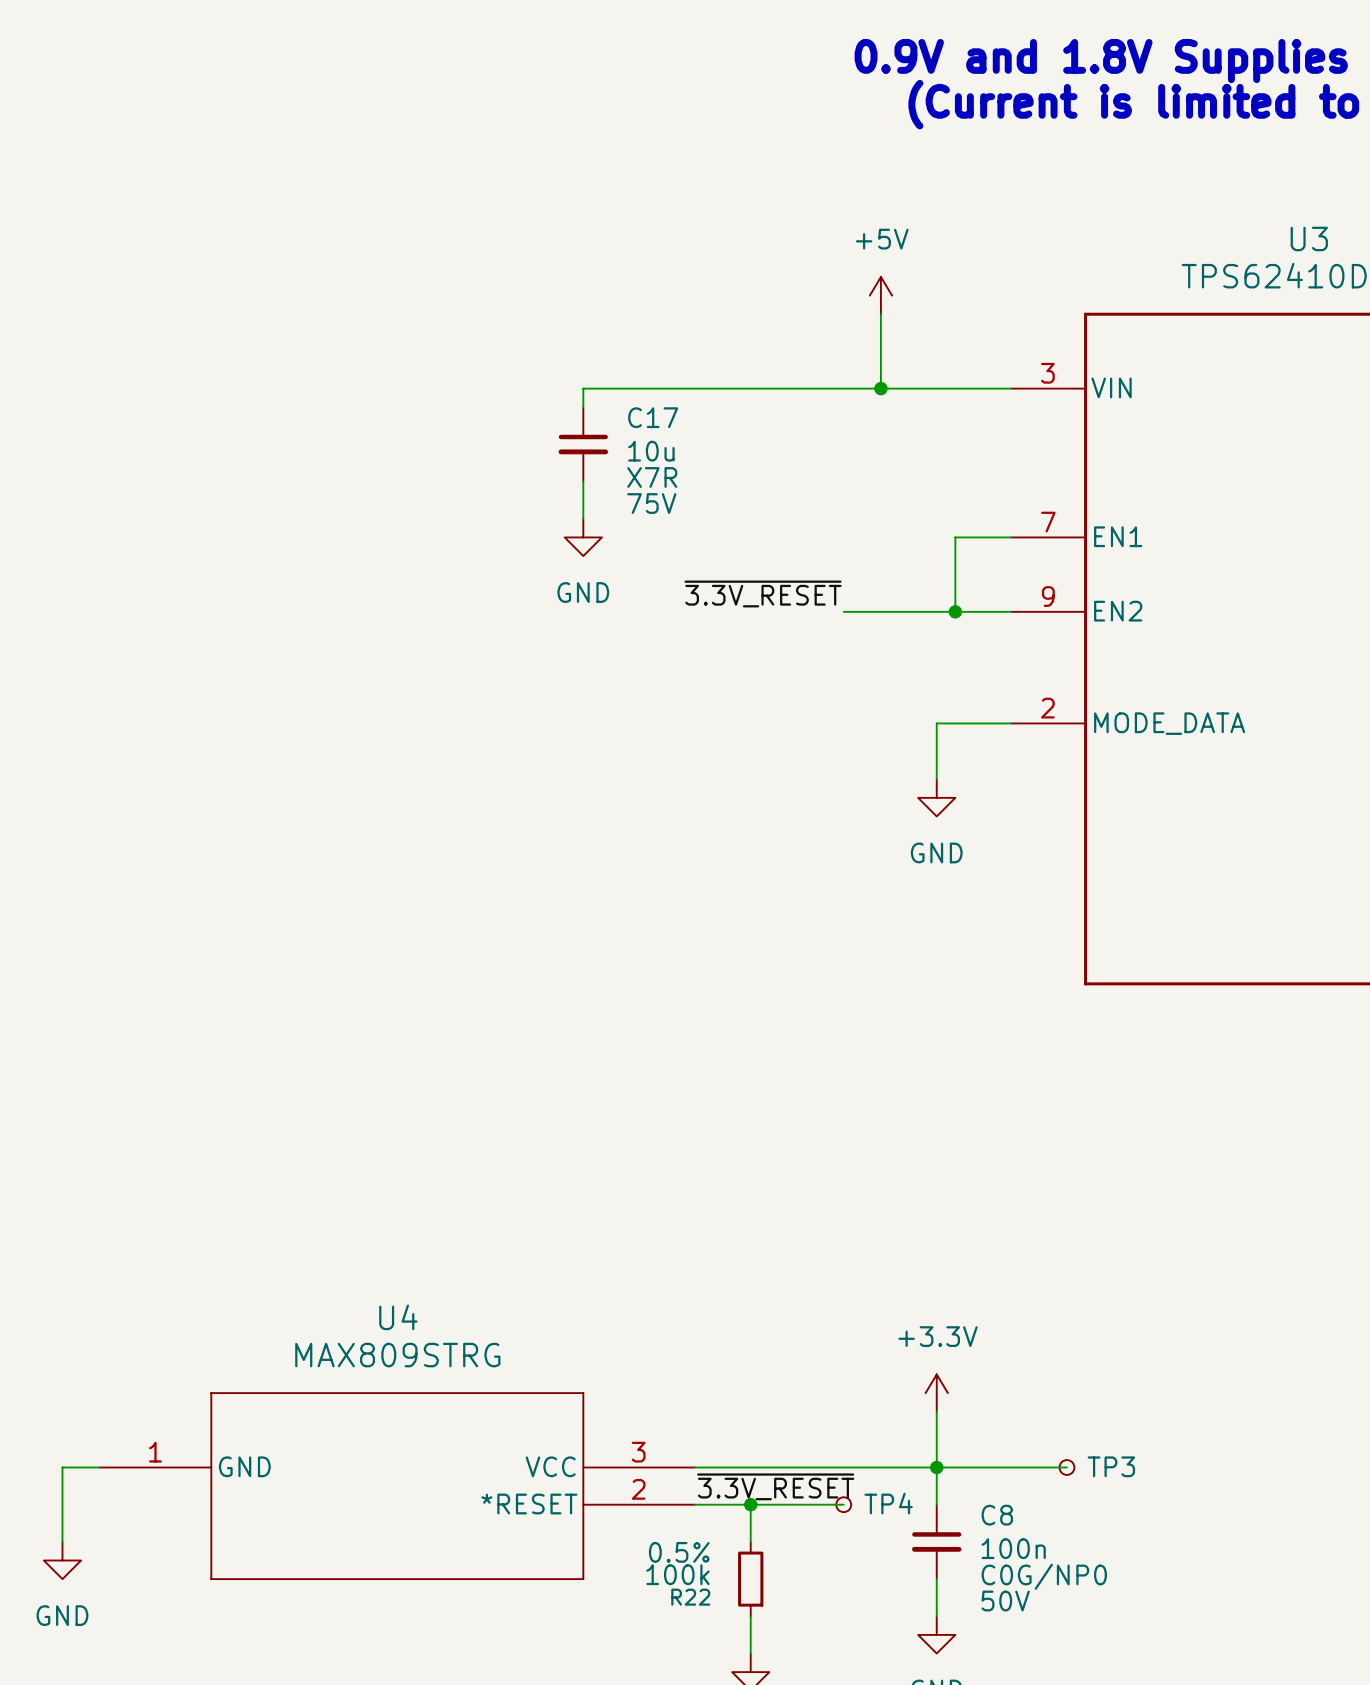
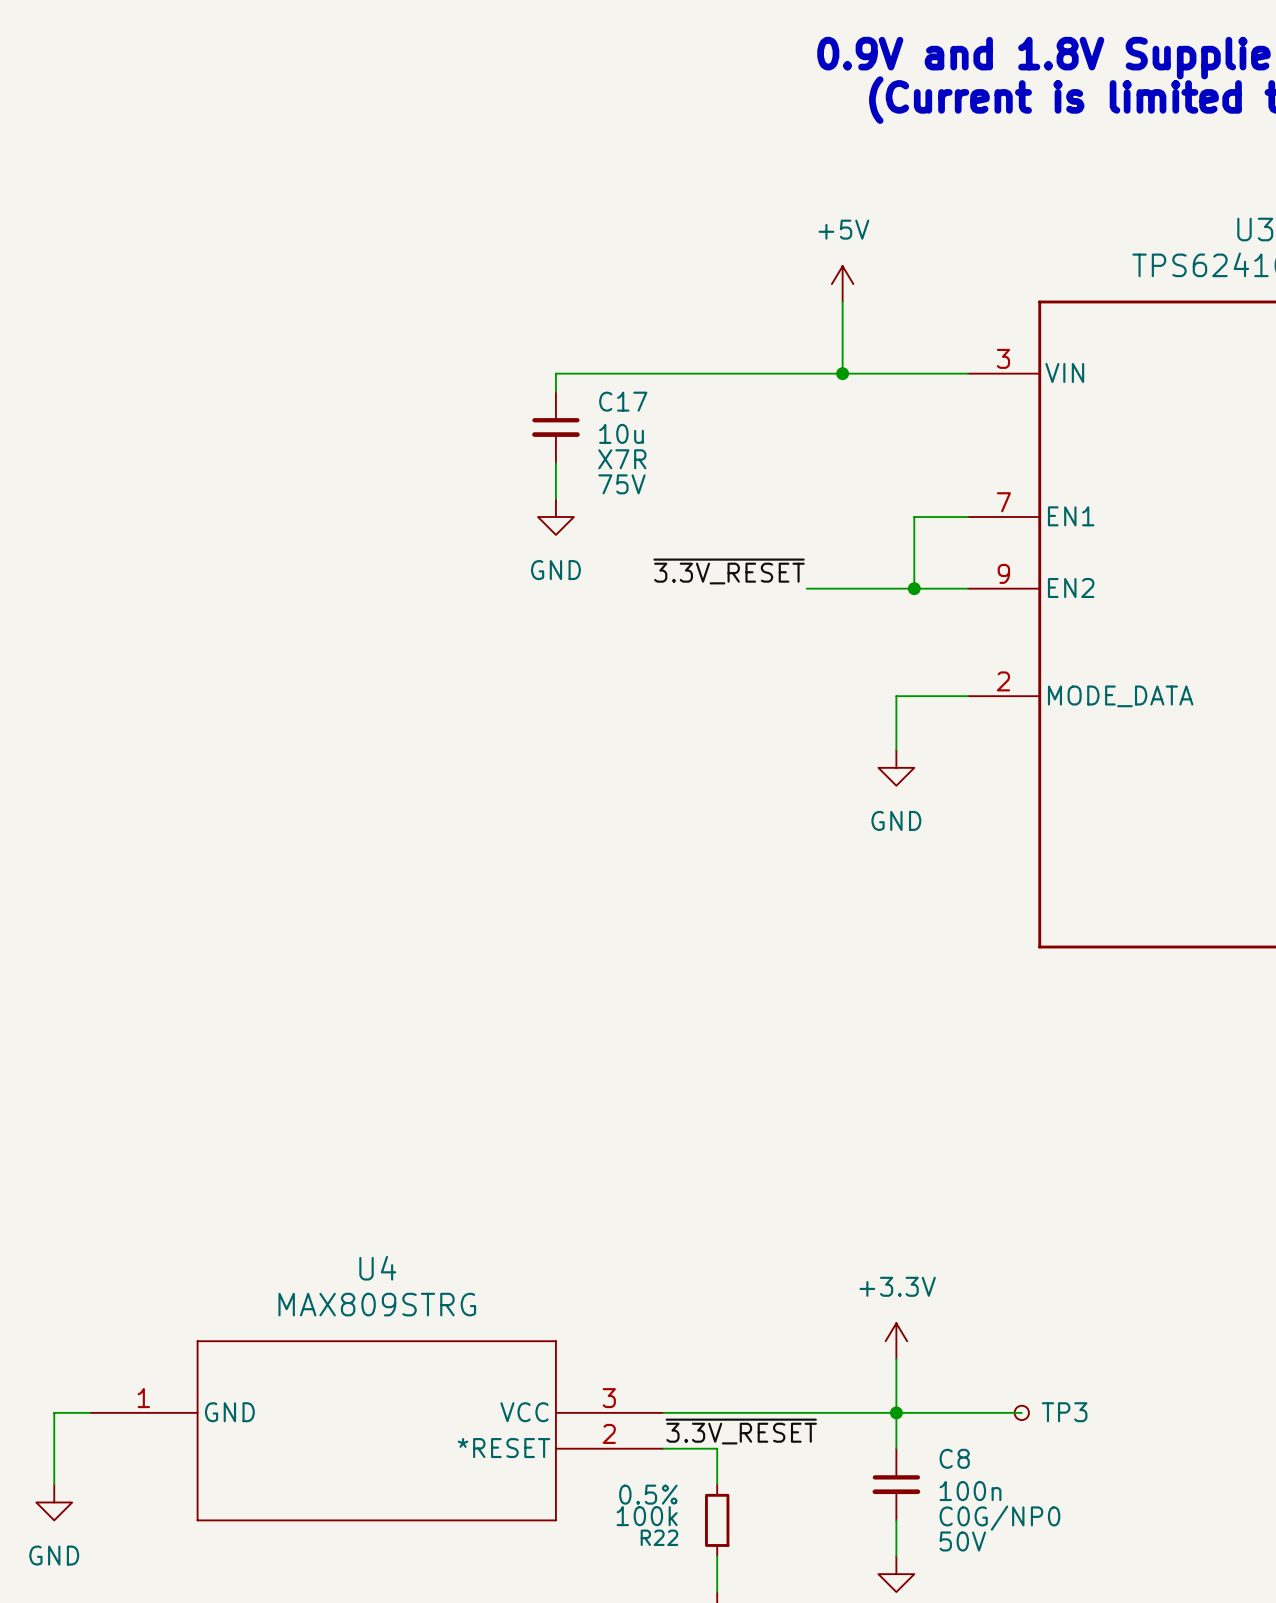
wire: (750, 1504) (843, 1504) -> none
junction: (750, 1504) -> none
TP4: (843, 1504) -> none

